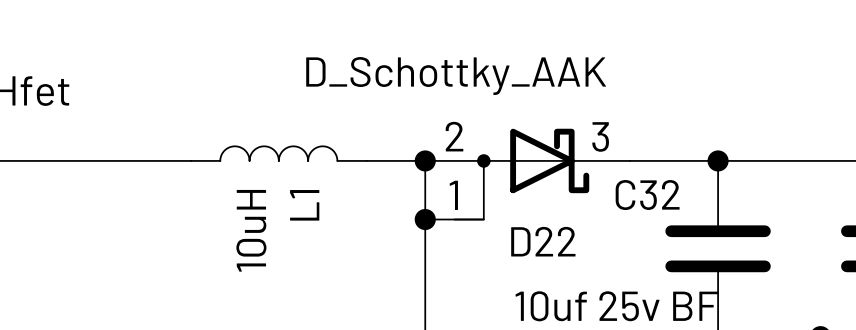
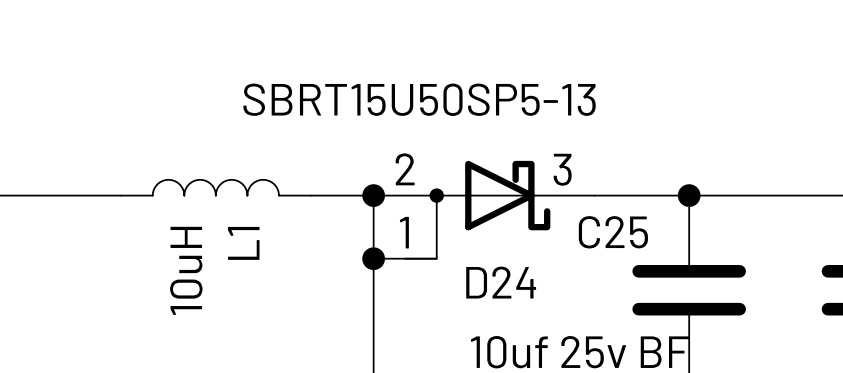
D22 value: D_Schottky_AAK (456, 76) -> SBRT15U50SP5-13 (419, 99)
C32 name: C32 (647, 195) -> C25 (613, 232)
D22 name: D22 (543, 241) -> D24 (501, 282)

